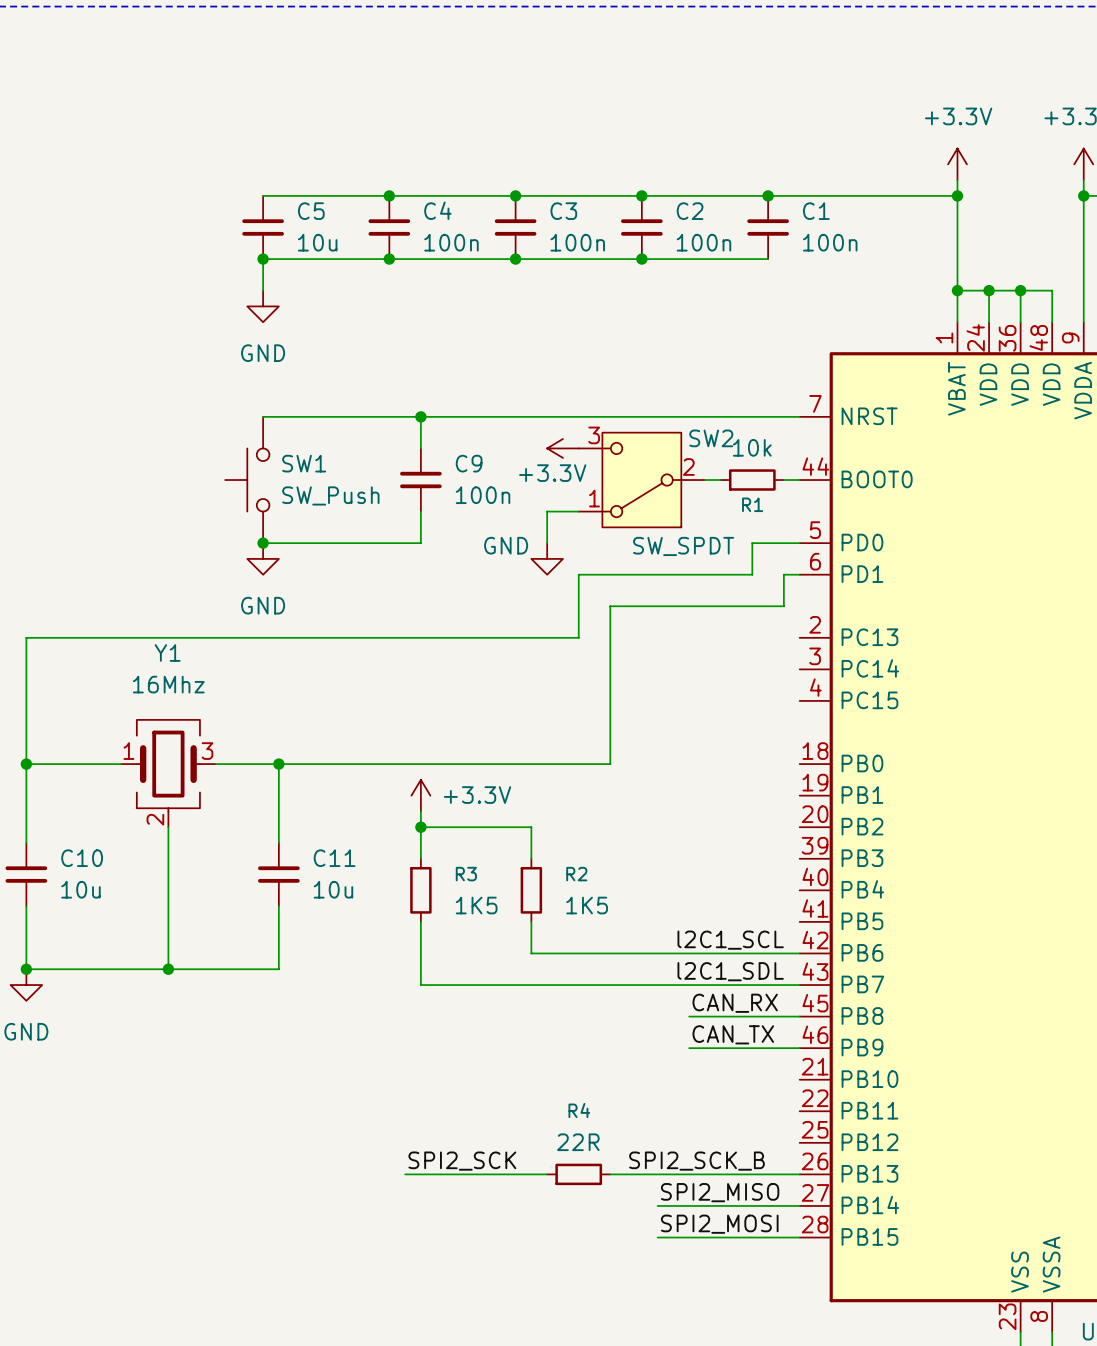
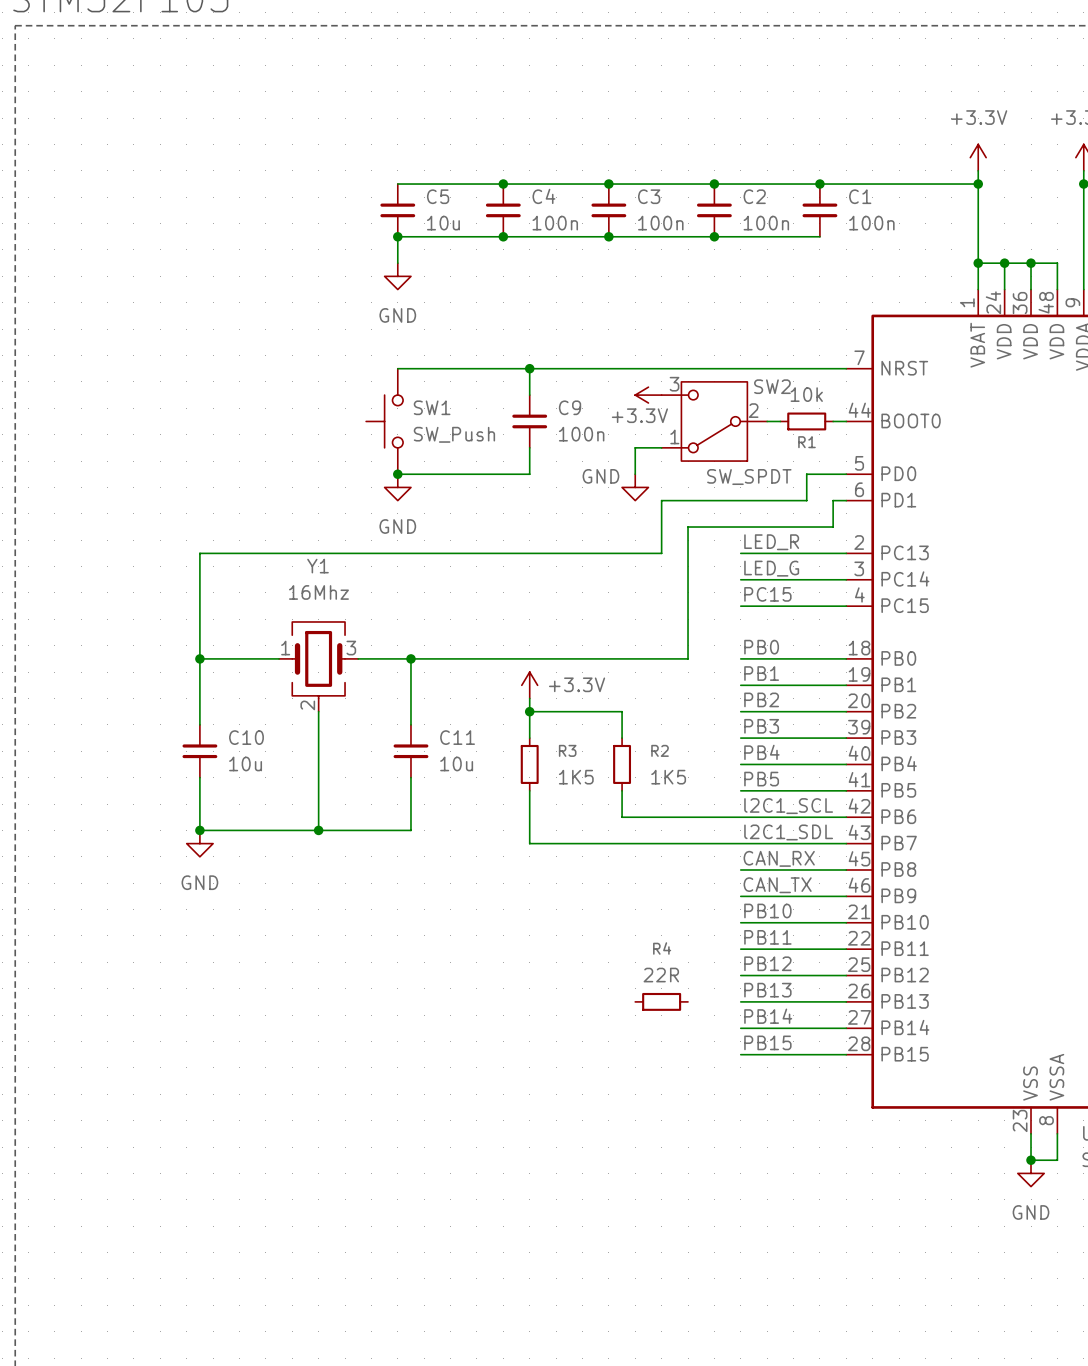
label: none -> LED_R (771, 542)
wire: none -> (740, 553) (846, 553)
label: none -> LED_G (771, 568)
wire: none -> (740, 579) (846, 579)
label: none -> PC15 (767, 594)
wire: none -> (740, 606) (846, 606)
label: none -> PB0 (761, 647)
wire: none -> (740, 658) (846, 658)
label: none -> PB1 (761, 673)
wire: none -> (740, 685) (846, 685)
label: none -> PB2 (761, 699)
wire: none -> (740, 711) (846, 711)
label: none -> PB3 (761, 726)
wire: none -> (740, 738) (846, 738)
label: none -> PB4 (761, 752)
wire: none -> (740, 764) (846, 764)
label: none -> PB5 (761, 779)
wire: none -> (740, 790) (846, 790)
label position: CAN_RX (735, 1003) -> CAN_RX (779, 858)
label position: CAN_TX (733, 1034) -> CAN_TX (777, 885)
label: none -> PB10 (767, 910)
wire: none -> (740, 922) (846, 922)
label: none -> PB11 (767, 937)
wire: none -> (740, 949) (846, 949)
label: none -> PB12 (767, 963)
wire: none -> (740, 975) (846, 975)
label: none -> PB13 (767, 990)
label: SPI2_SCK (462, 1161) -> none
label: SPI2_SCK_B (696, 1161) -> none
wire: (405, 1174) (547, 1174) -> none
wire: (610, 1174) (673, 1174) -> none
label: none -> PB14 (768, 1016)
label: SPI2_MISO (720, 1192) -> none
wire: (657, 1205) (673, 1205) -> (740, 870) (753, 870)
label: none -> PB15 (767, 1042)
label: SPI2_MOSI (719, 1224) -> none
wire: (657, 1237) (673, 1237) -> (740, 896) (753, 896)

